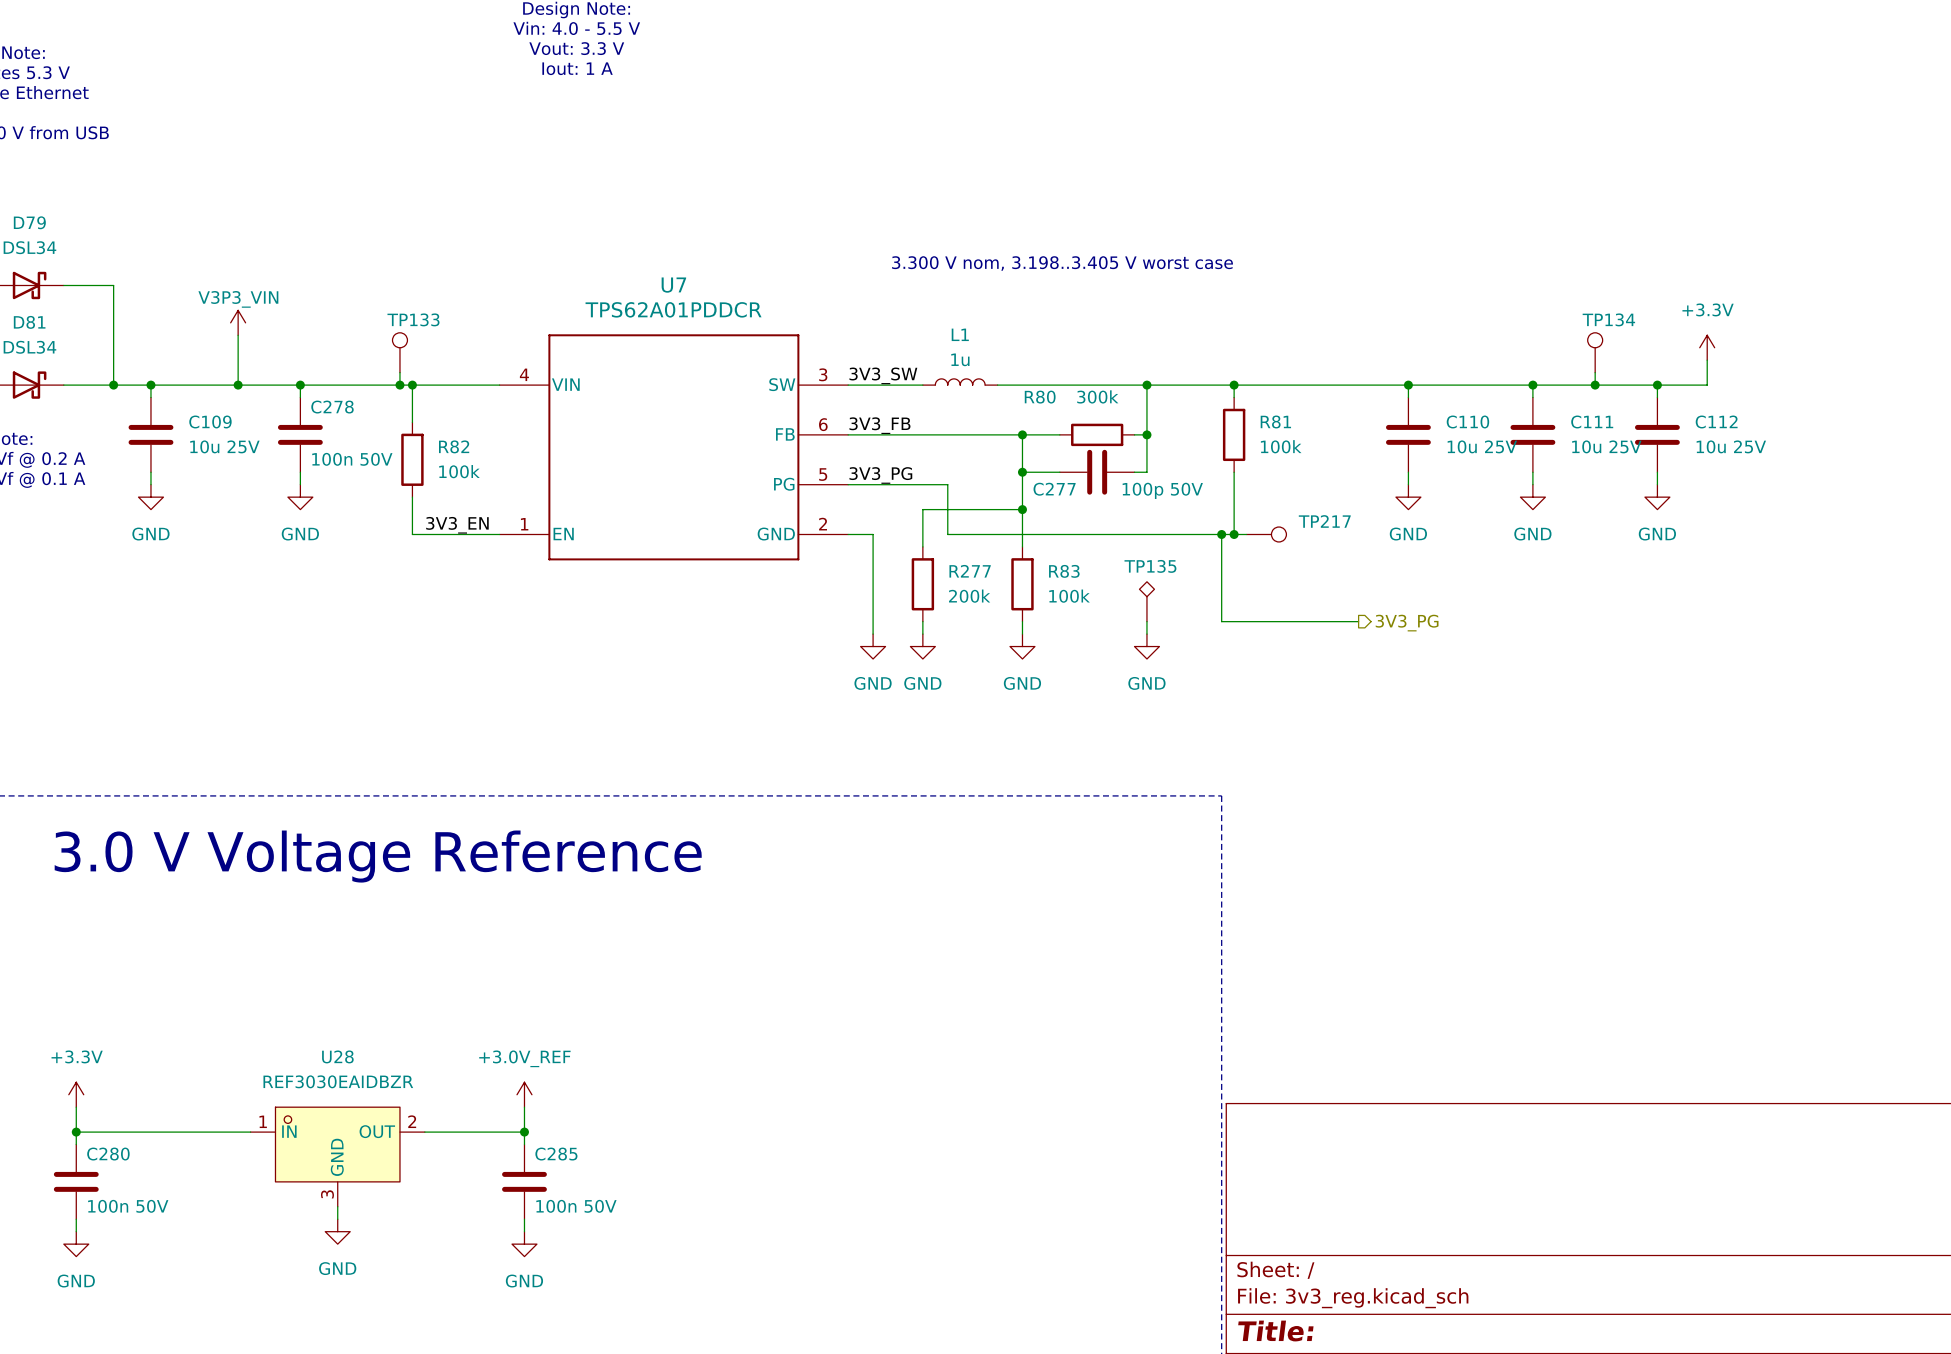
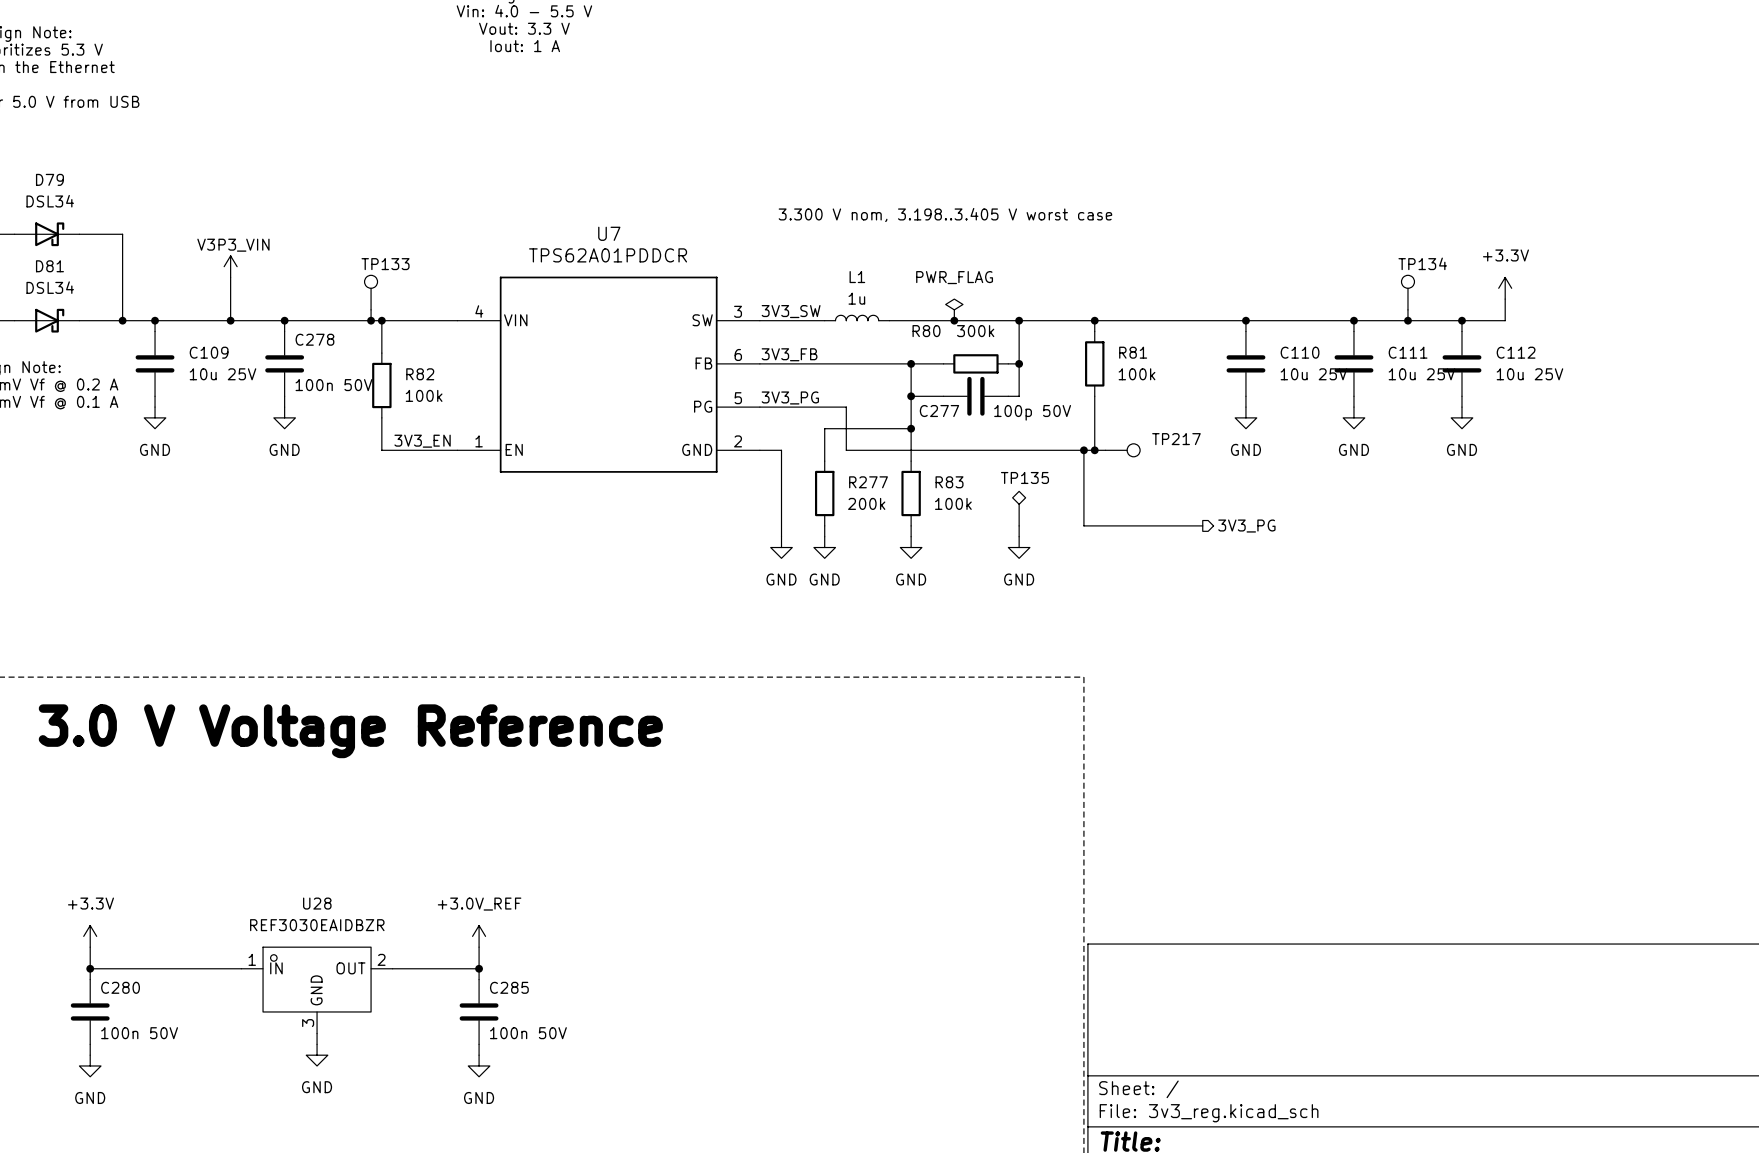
power symbol: none -> PWR_FLAG (954, 309)
junction: none -> (954, 320)

